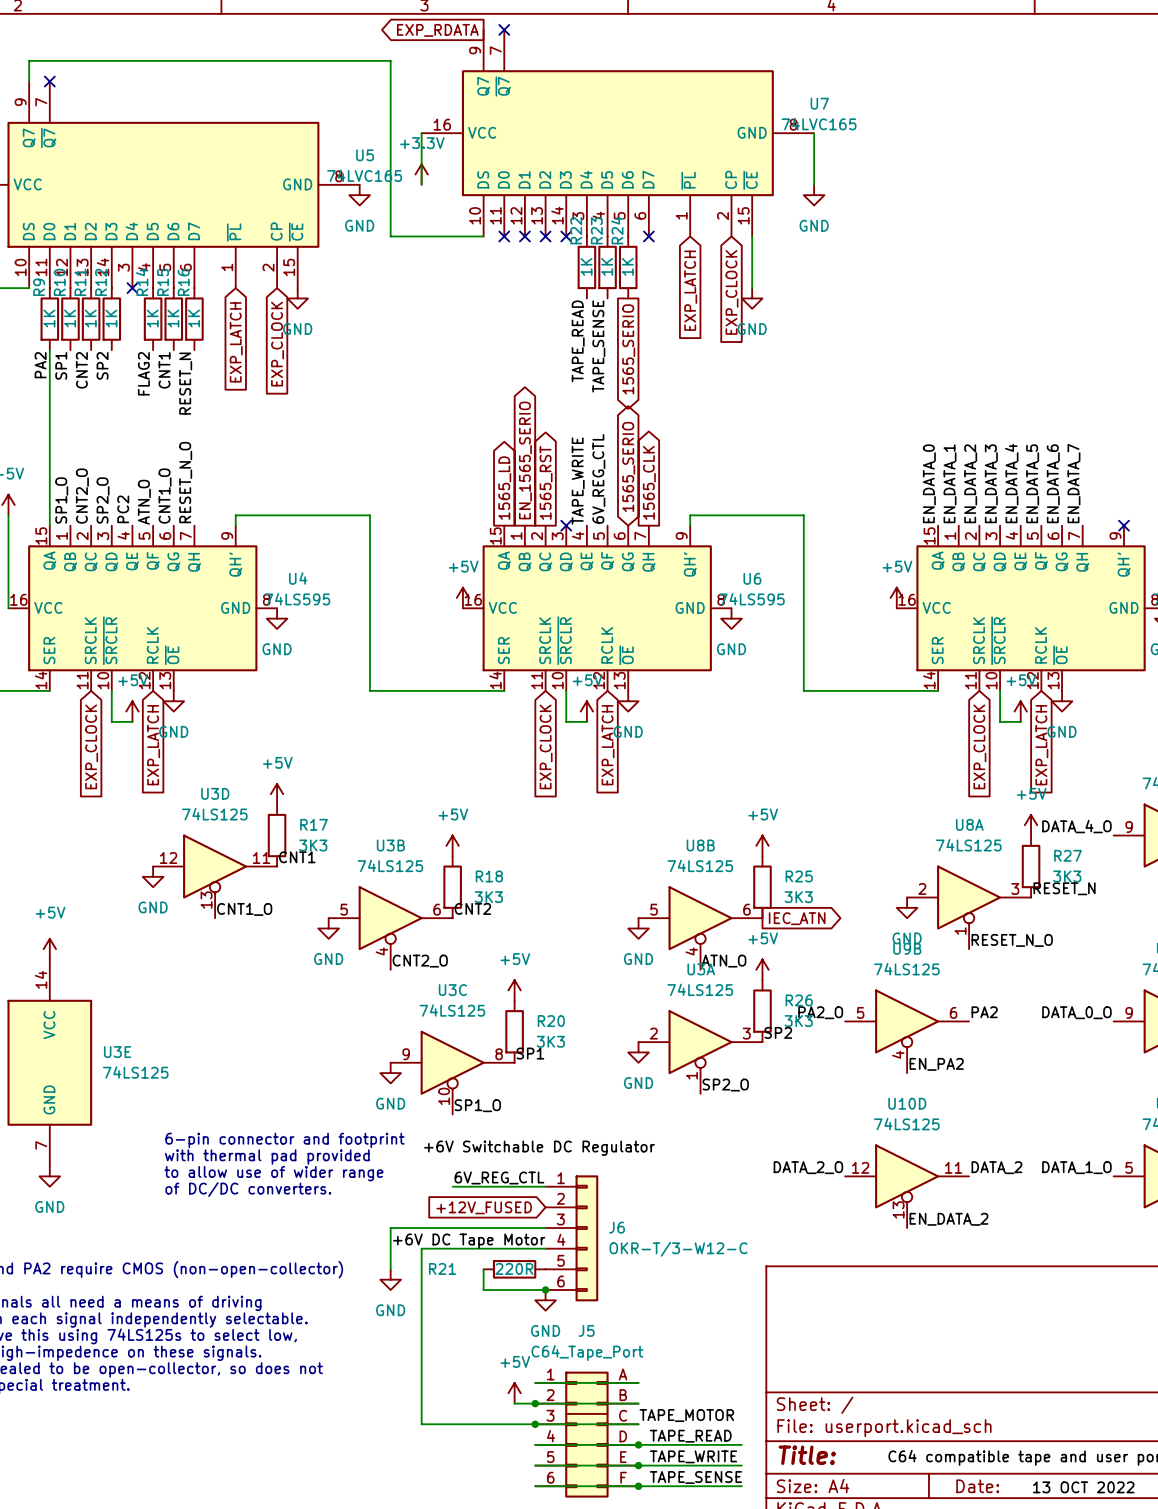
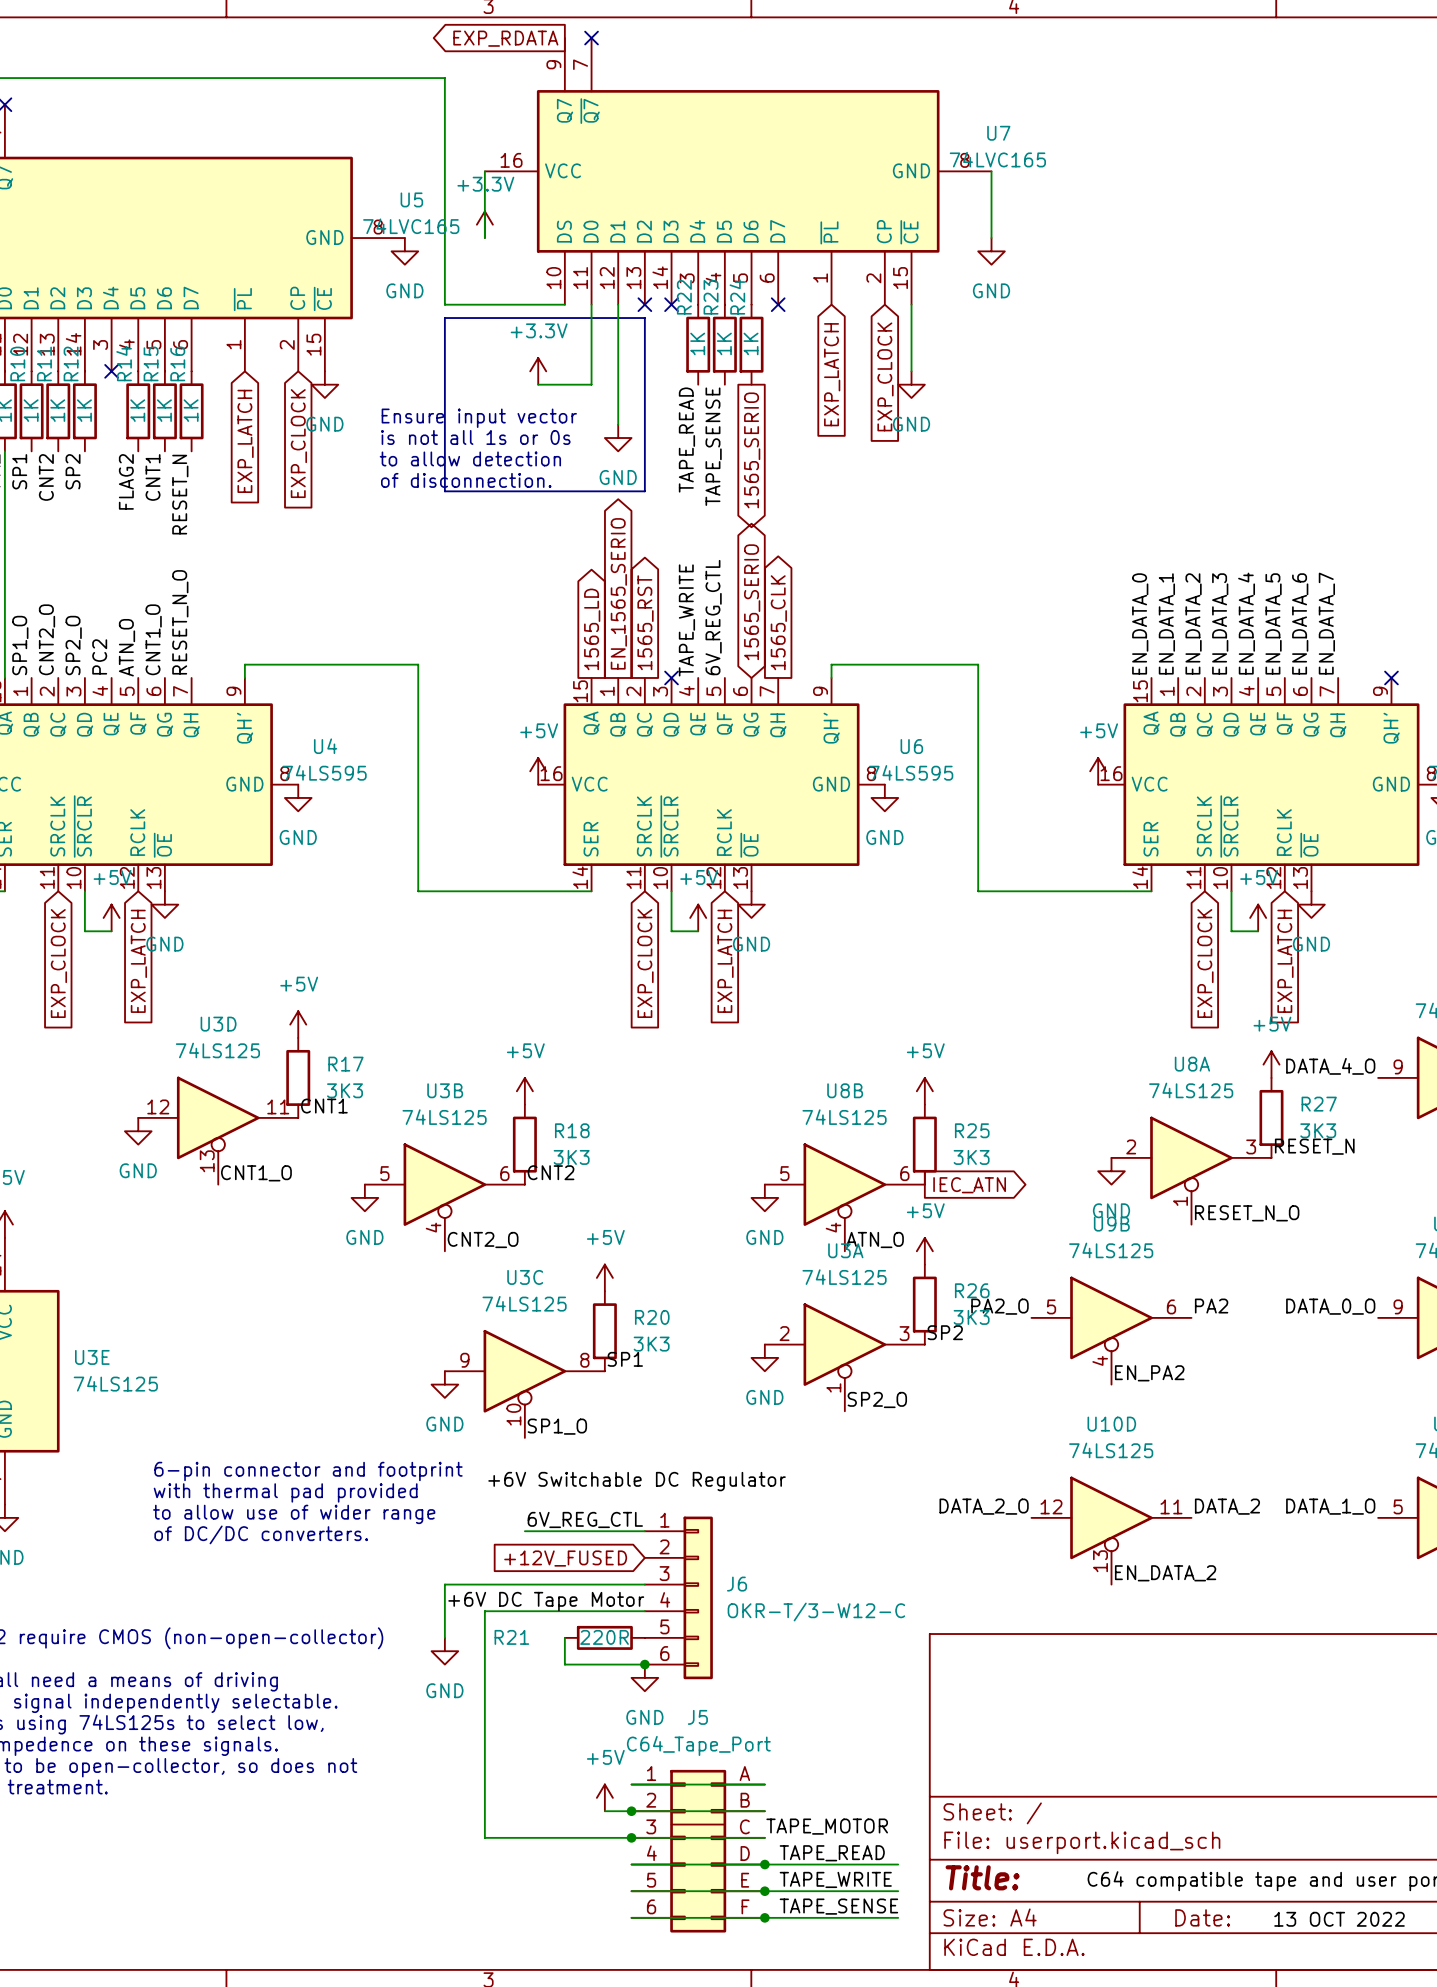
wire: none -> (591, 304) (591, 384) (538, 384)
no-connect mark: (504, 236) -> none
wire: none -> (618, 304) (618, 424)
no-connect mark: (524, 236) -> none
line: none -> (444, 318) (644, 318) (644, 491) (444, 491) (444, 318)
power symbol: none -> +3.3V (538, 371)
text: none -> Ensure input vector (479, 418)
text: none -> is not all 1s or 0s (475, 437)
power symbol: none -> GND (618, 438)
text: none -> to allow detection (470, 458)
text: none -> of disconnection. (466, 480)

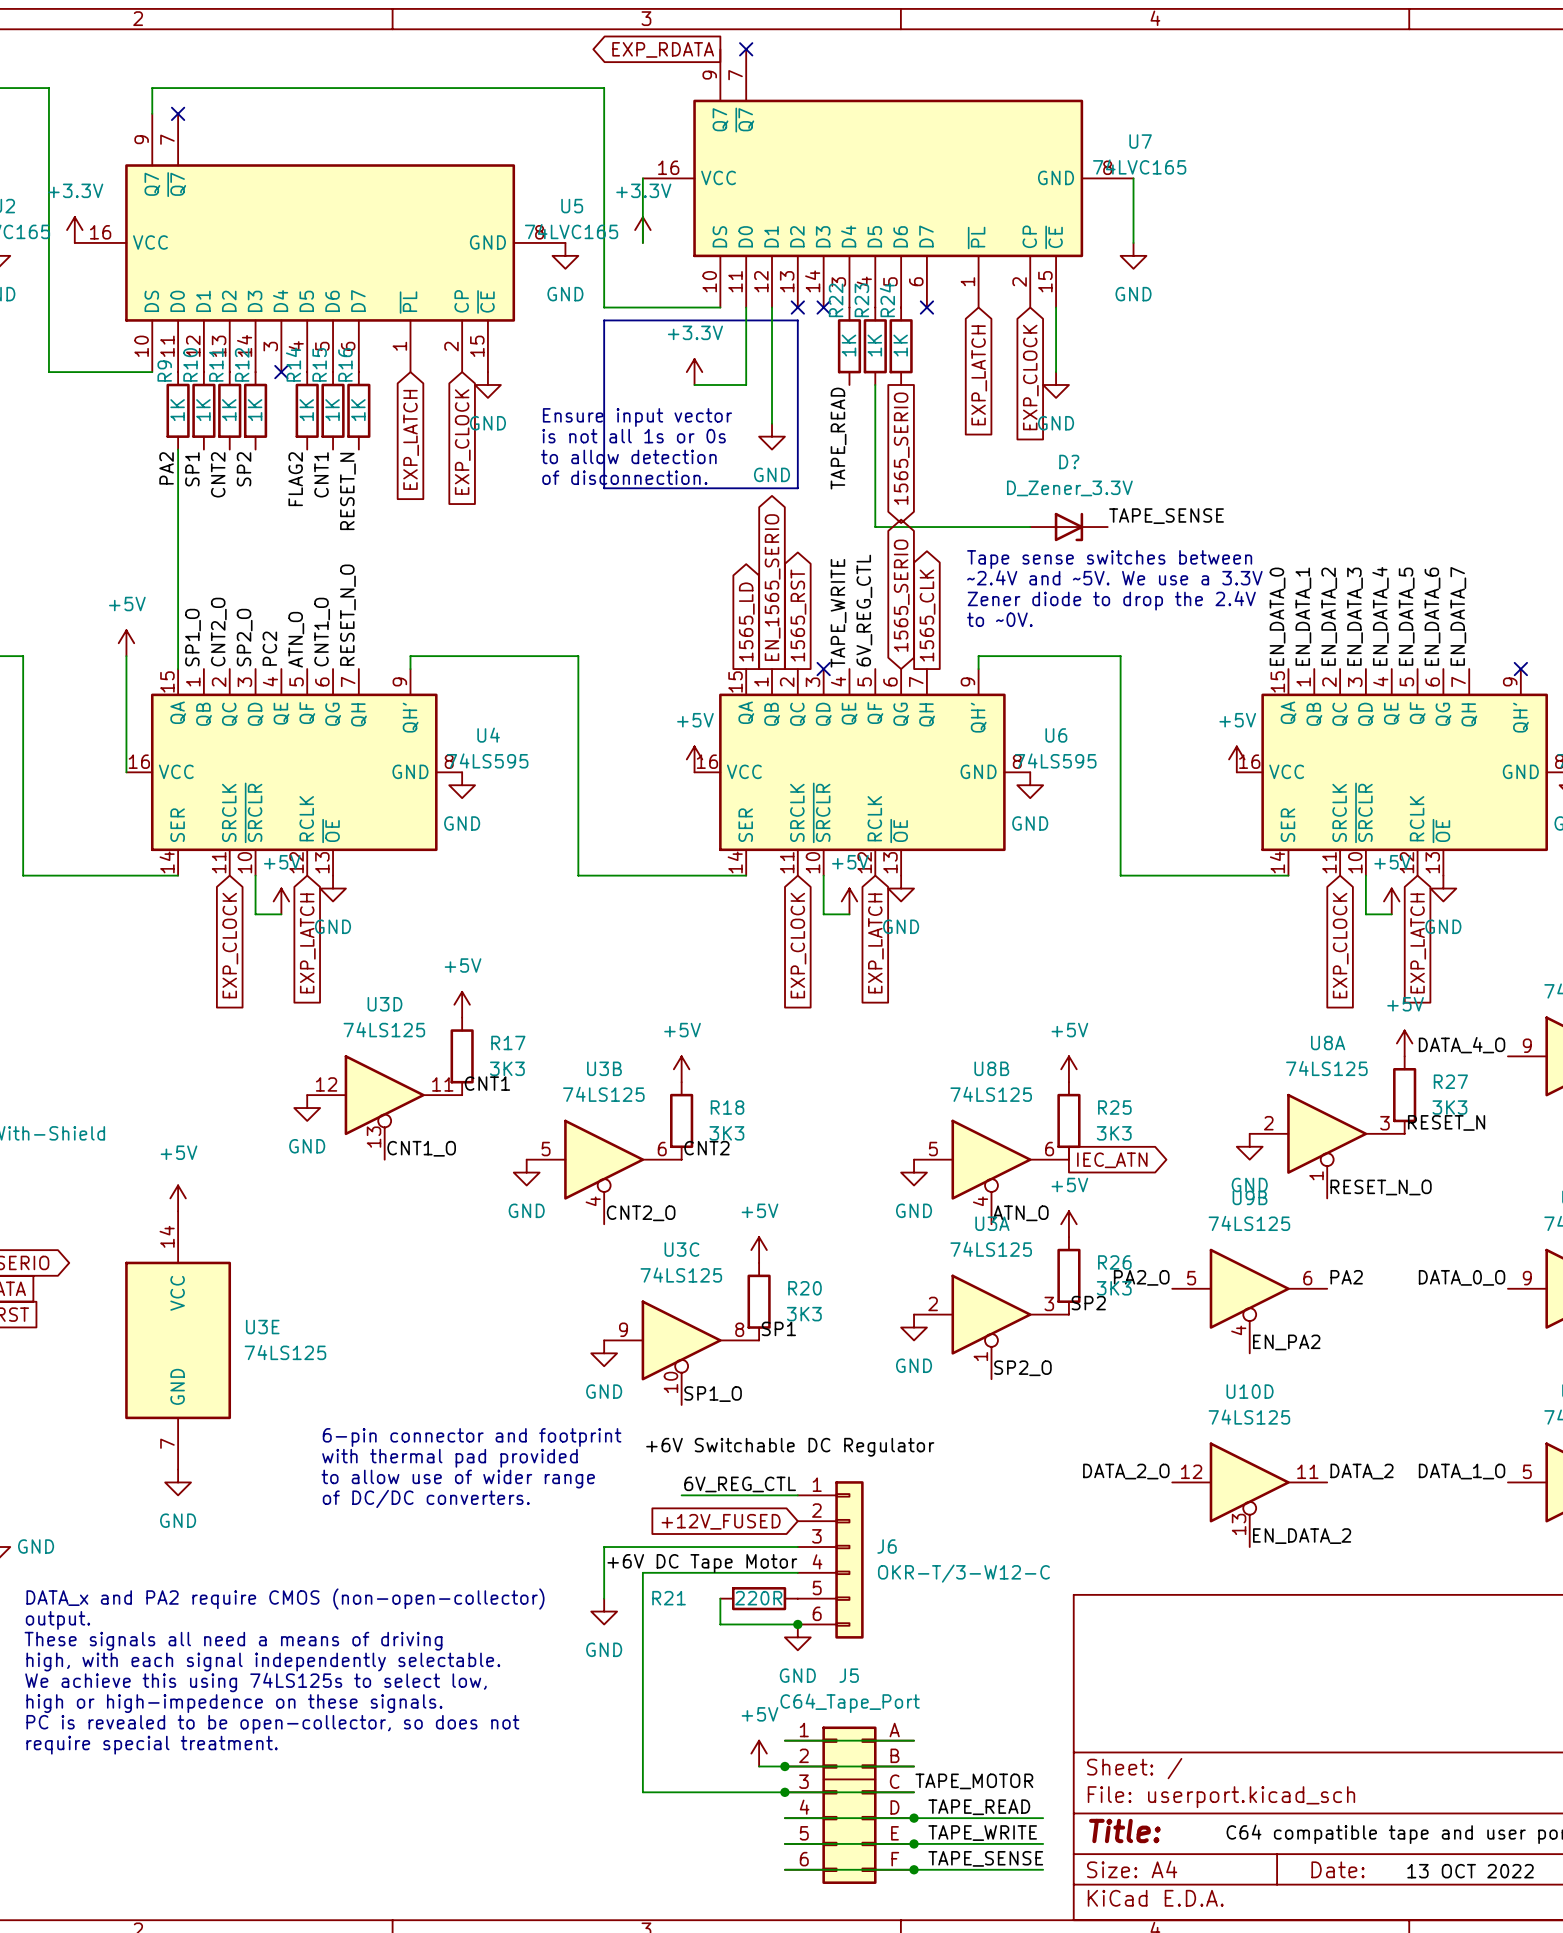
wire: none -> (875, 385) (875, 527) (1030, 527)
label: TAPE_SENSE (713, 446) -> none
label: none -> TAPE_SENSE (1166, 516)
D?: none -> D_Zener_3.3V (1068, 527)
text: none -> Tape sense switches between (1109, 559)
text: none -> ~2.4V and ~5V. We use a 3.3V (1114, 577)
text: none -> Zener diode to drop the 2.4V (1111, 600)
text: none -> to ~0V. (999, 619)

